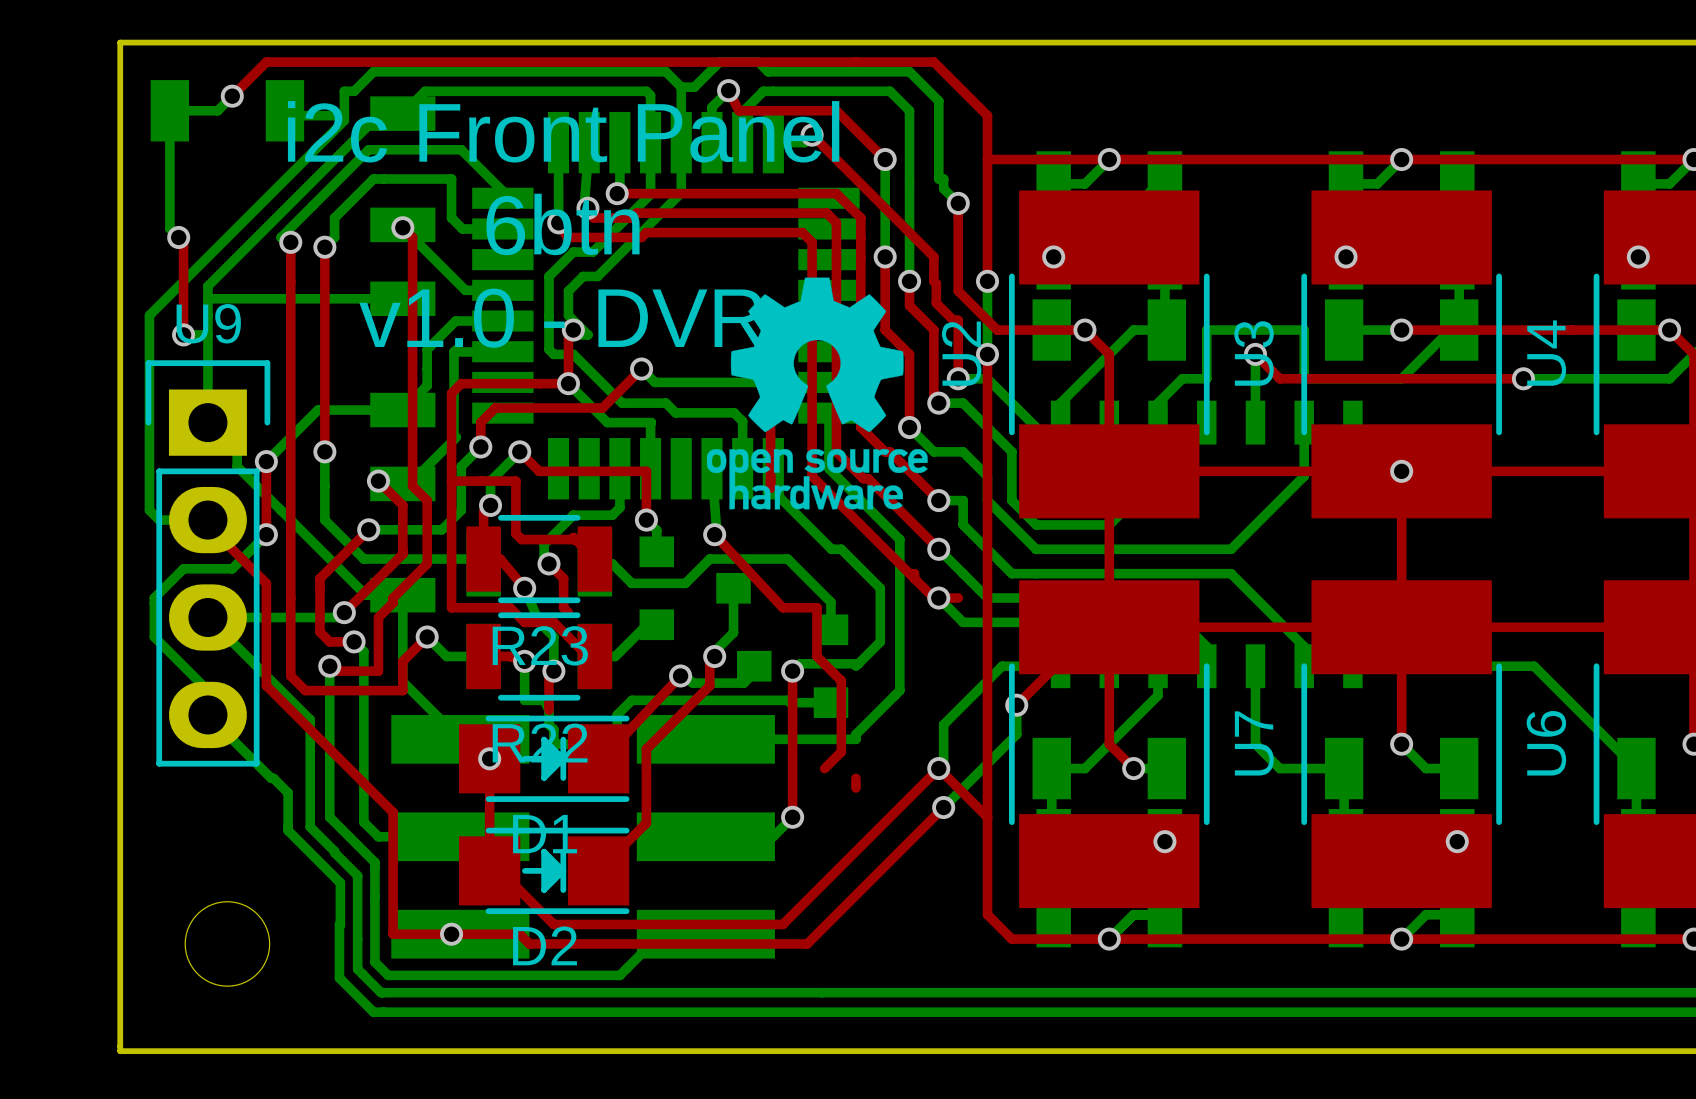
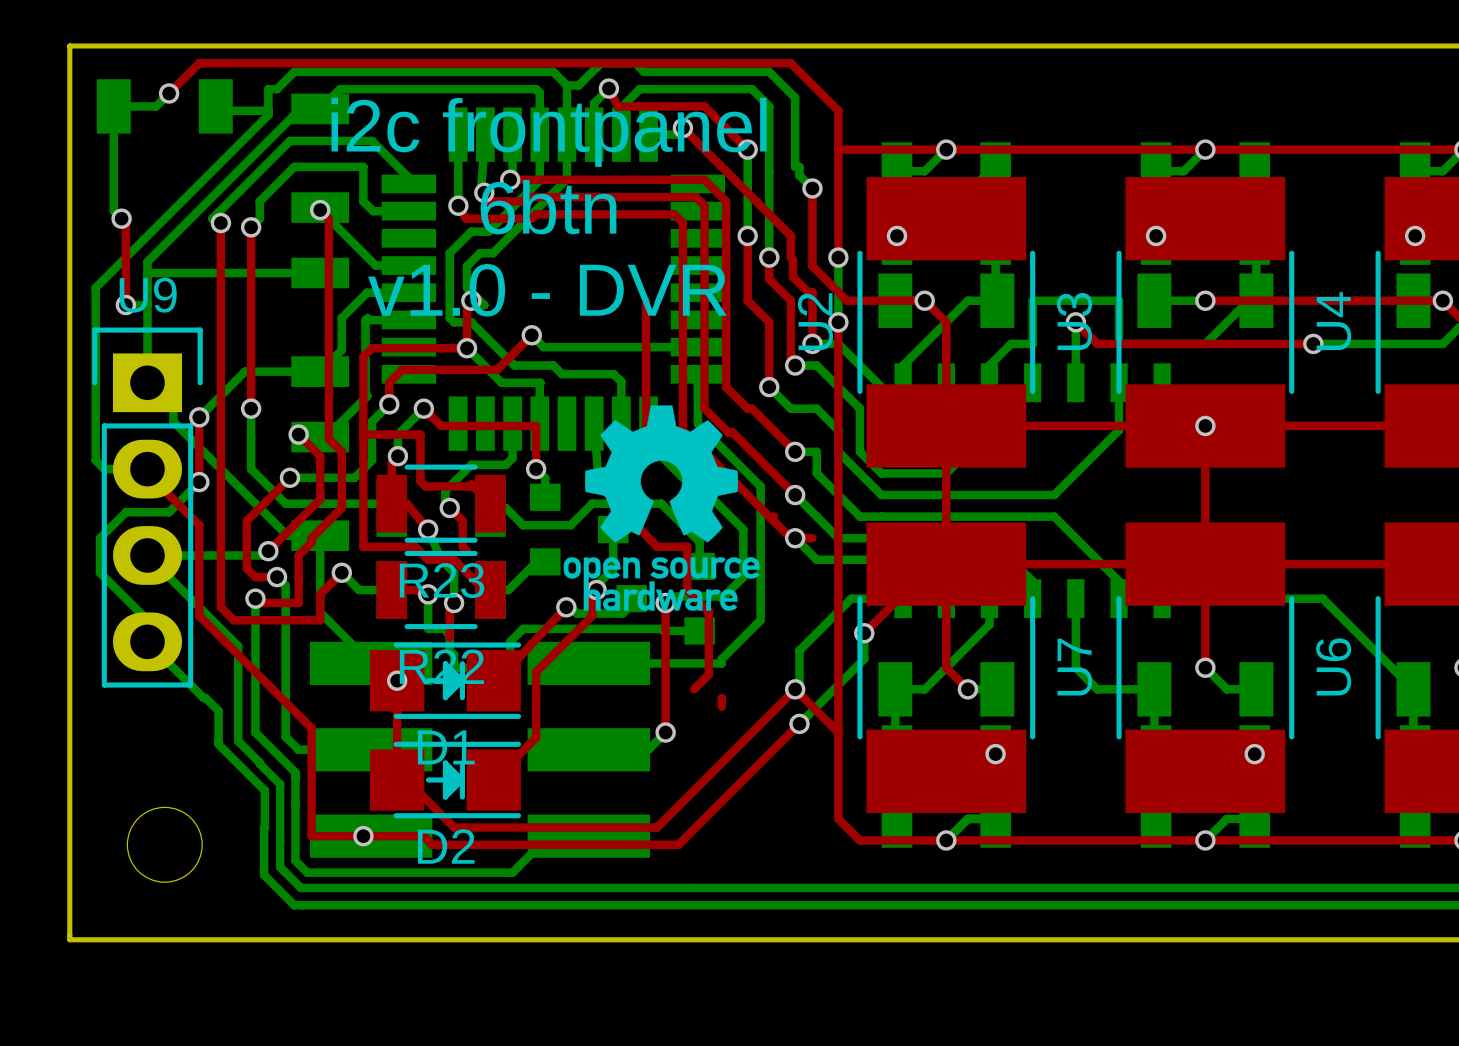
text: i2c Front Panel (563, 131) -> i2c frontpanel (549, 132)
text position: 6btn (563, 224) -> 6btn (548, 207)
text position: v1.0 - DVR (561, 318) -> v1.0 - DVR (547, 290)
drawing position: (817, 393) -> (661, 508)

